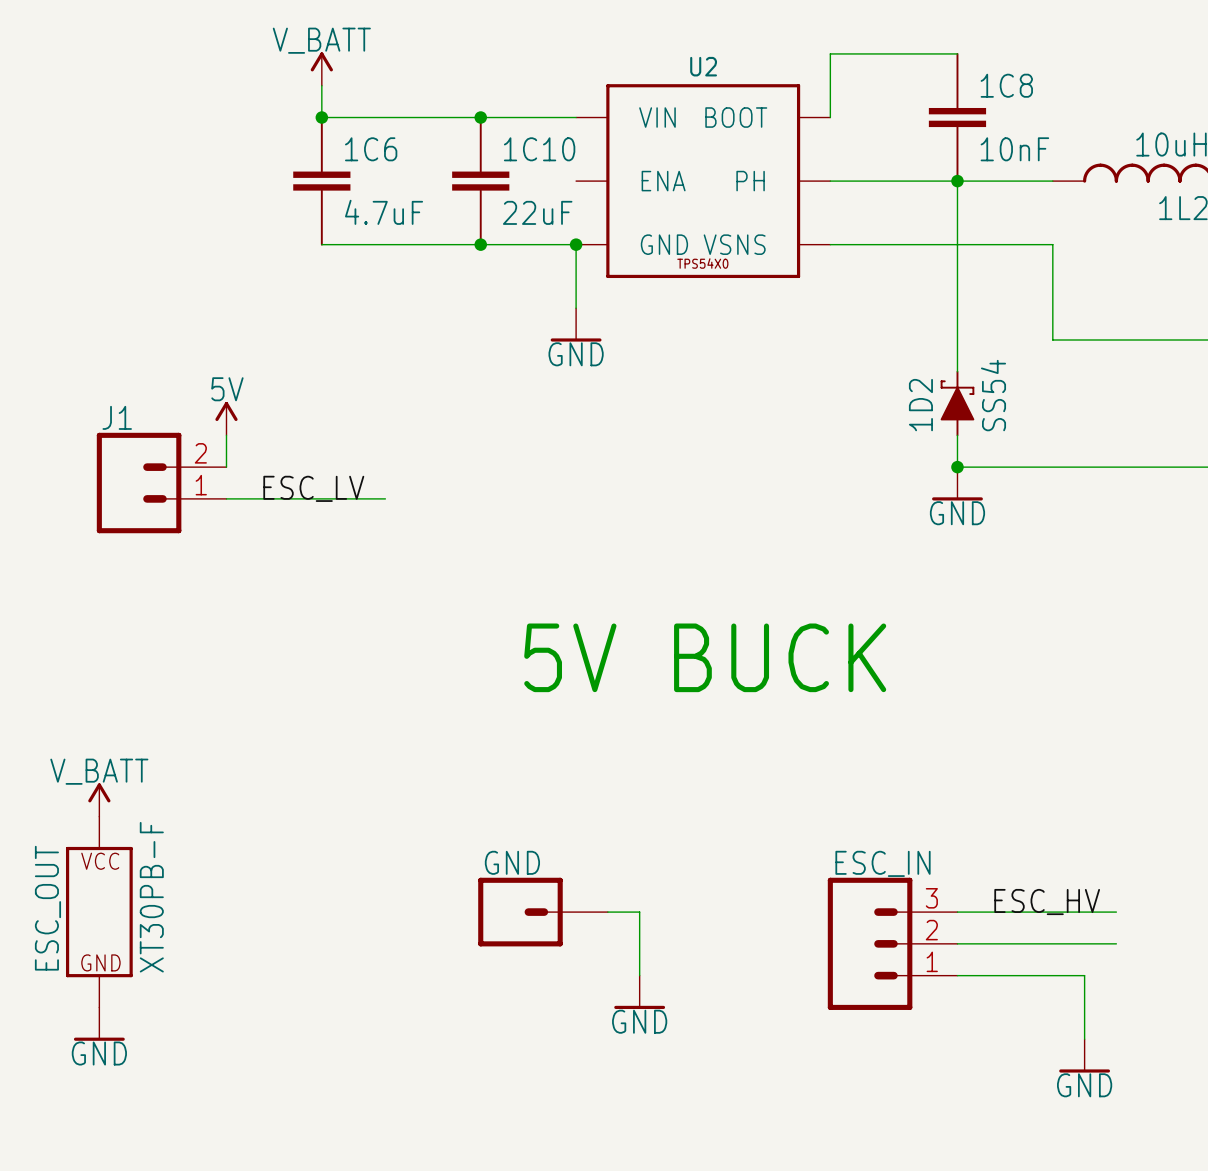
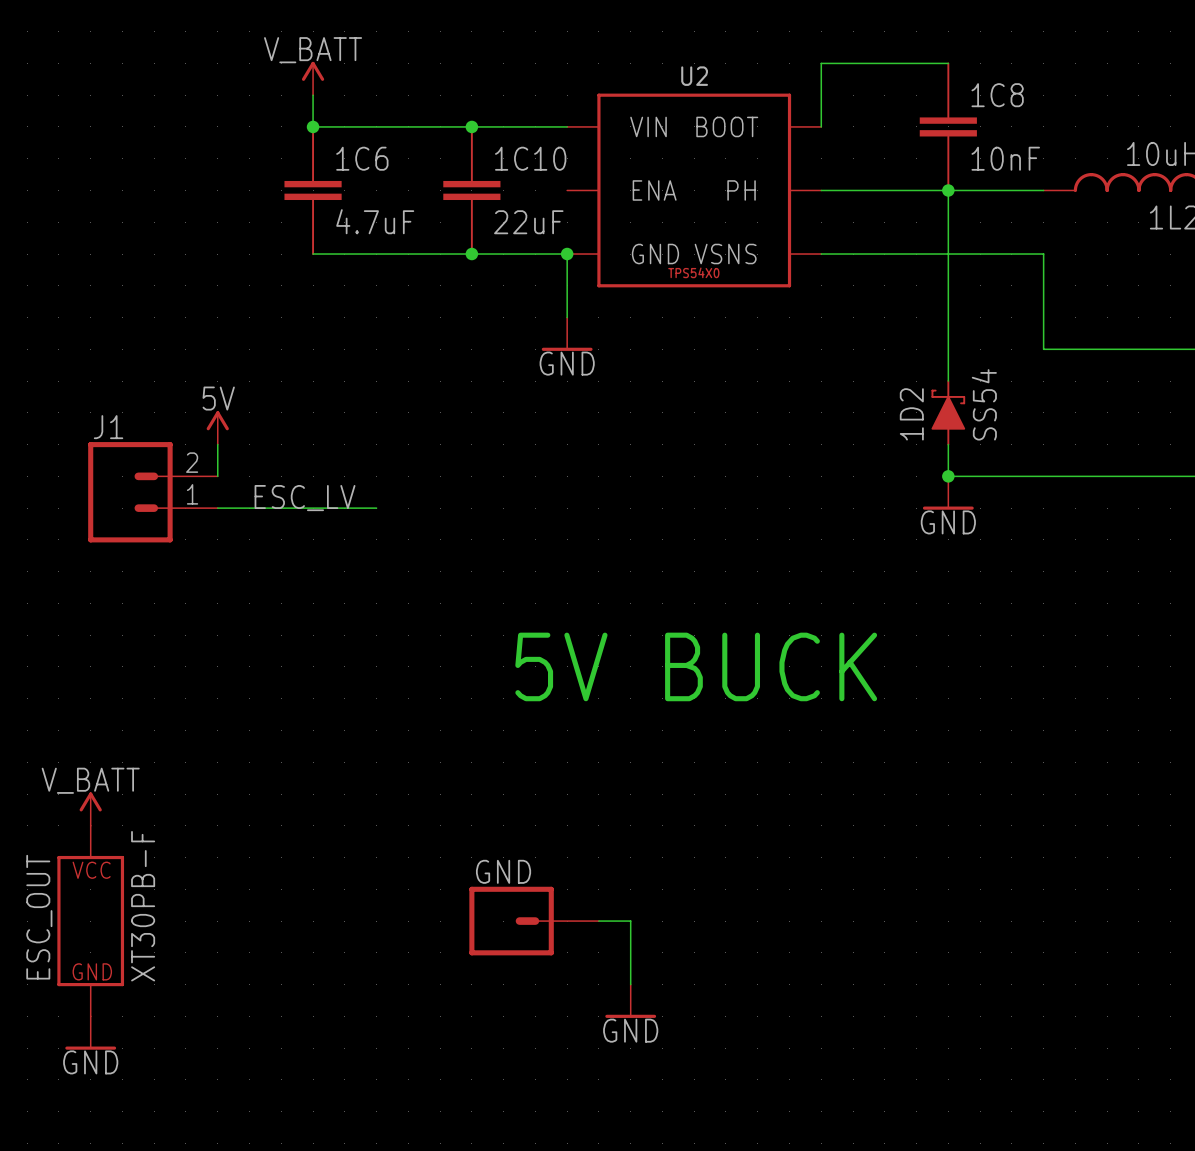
label: ESC_HV (1047, 902) -> none
wire: (957, 912) (1116, 912) -> none
ESC_IN: (892, 943) -> none
wire: (957, 943) (1116, 943) -> none
wire: (957, 975) (1084, 975) (1084, 1039) -> none
power symbol: GND (1084, 1055) -> none

